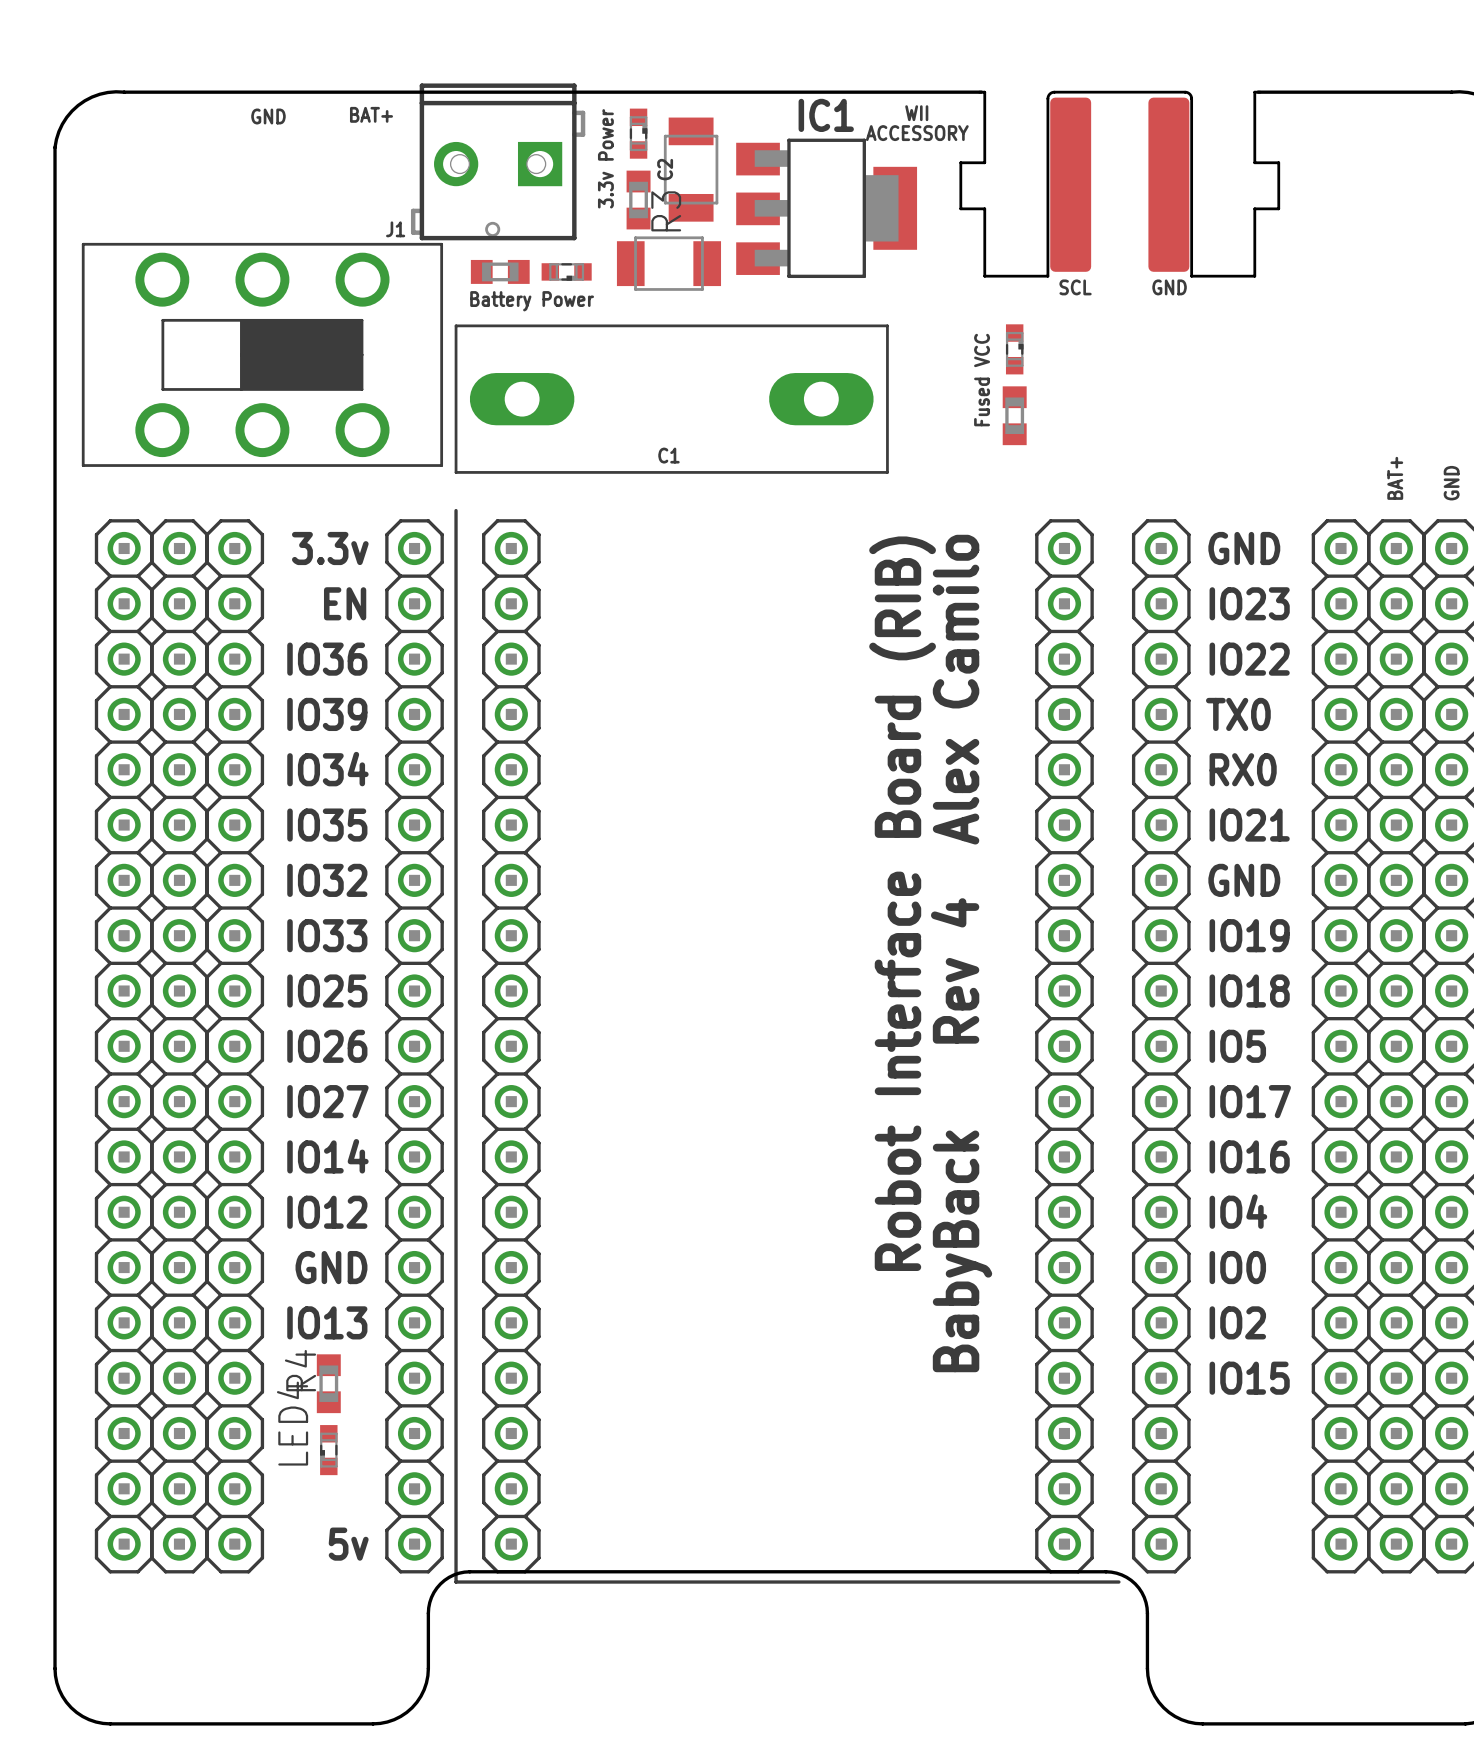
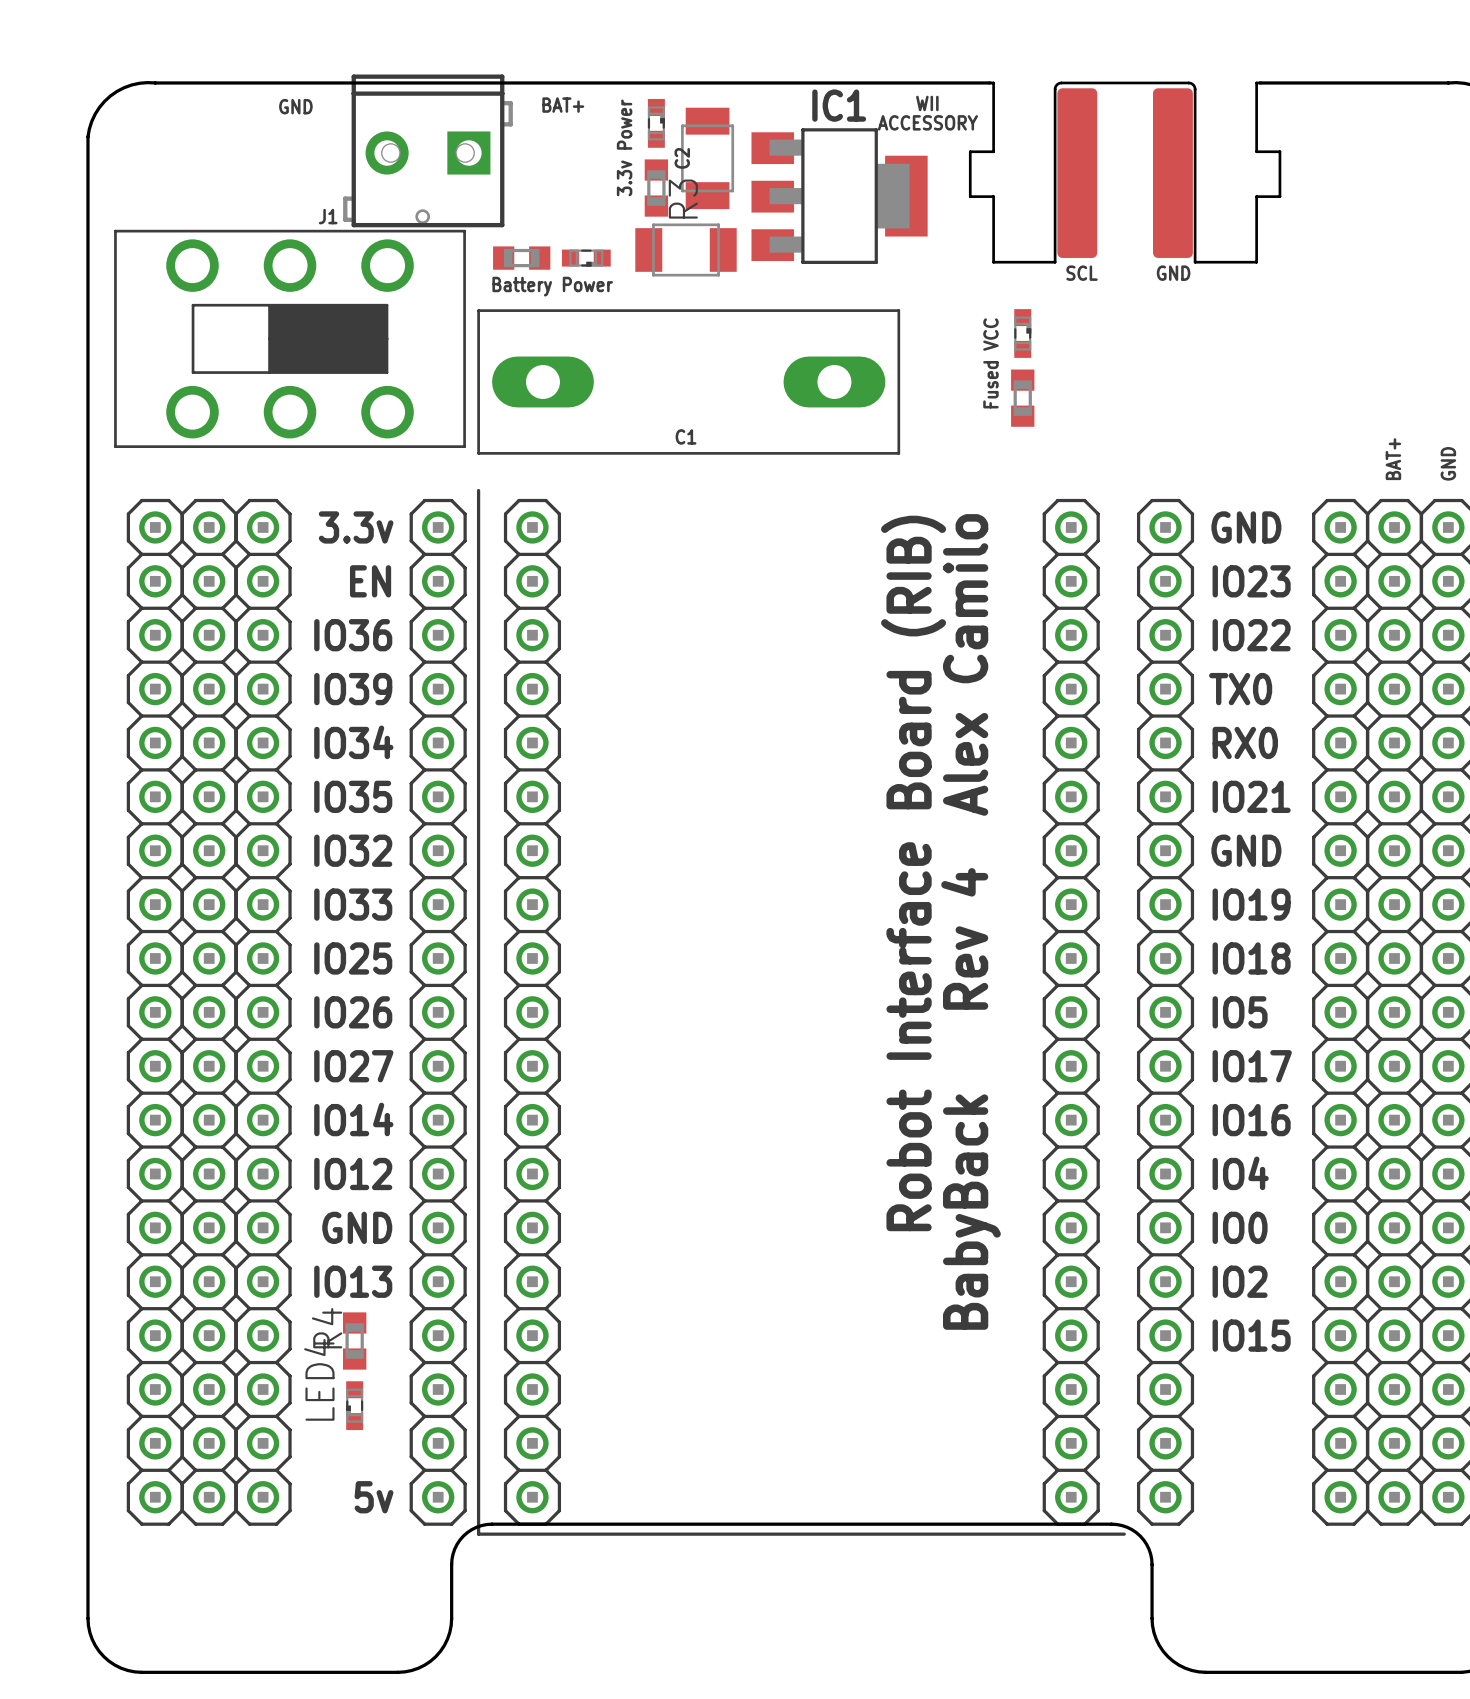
text position: BAT+ (371, 114) -> BAT+ (563, 105)
J1 position: (498, 161) -> (427, 150)

